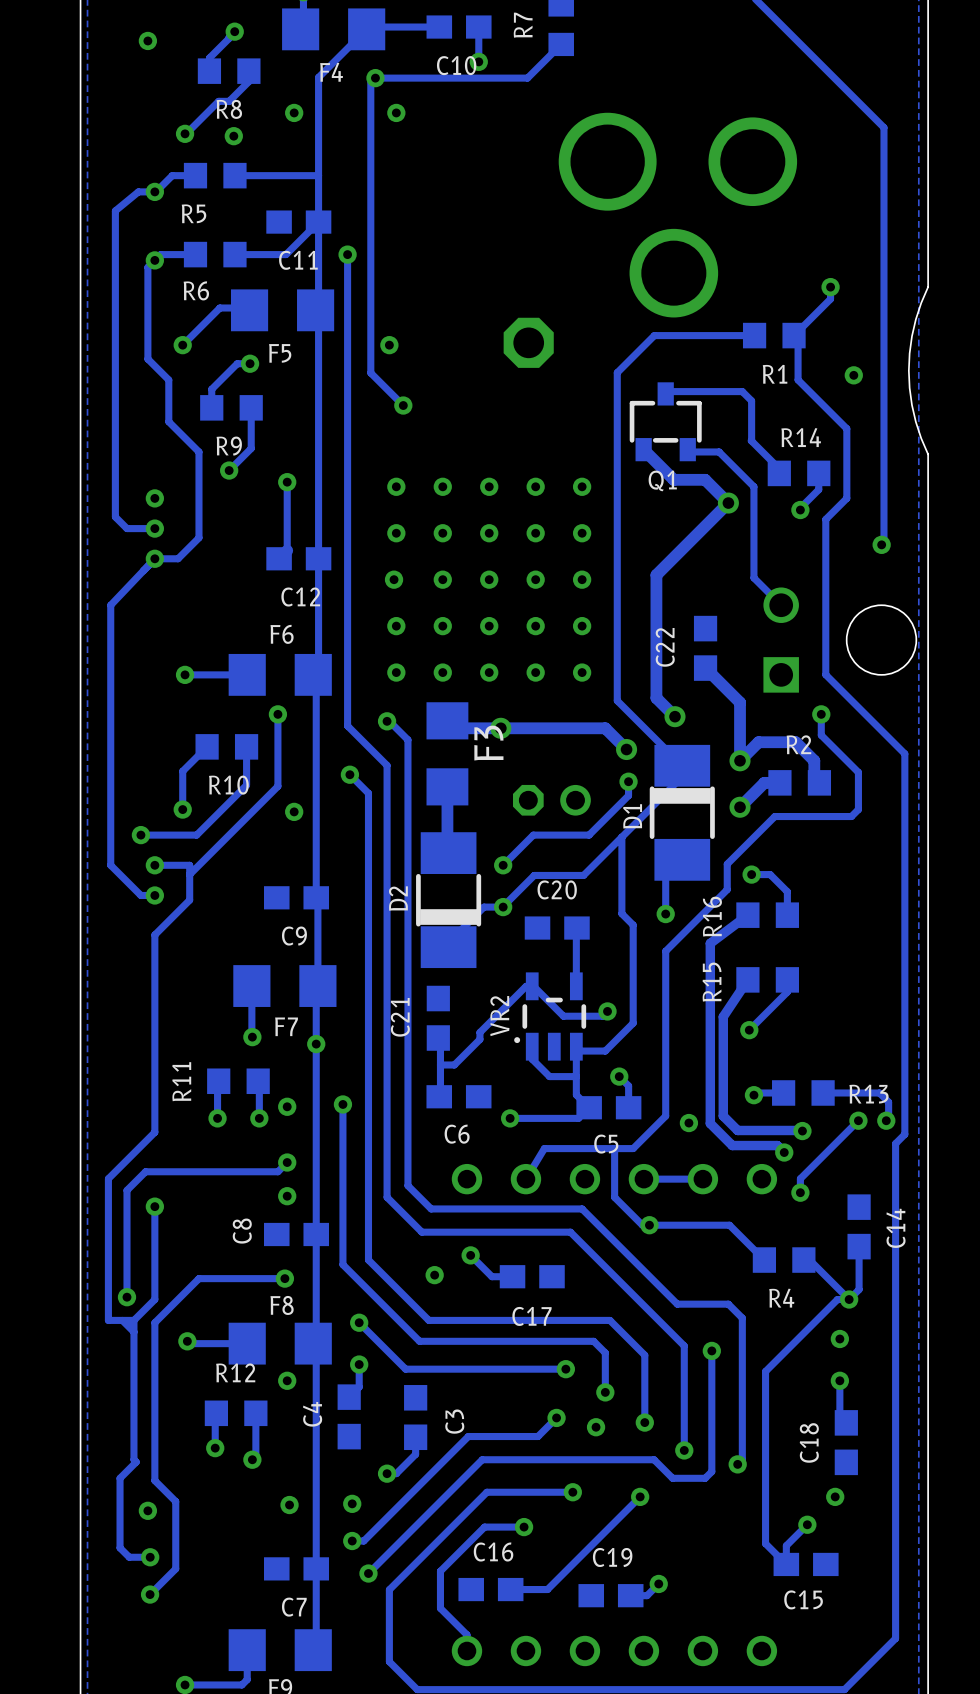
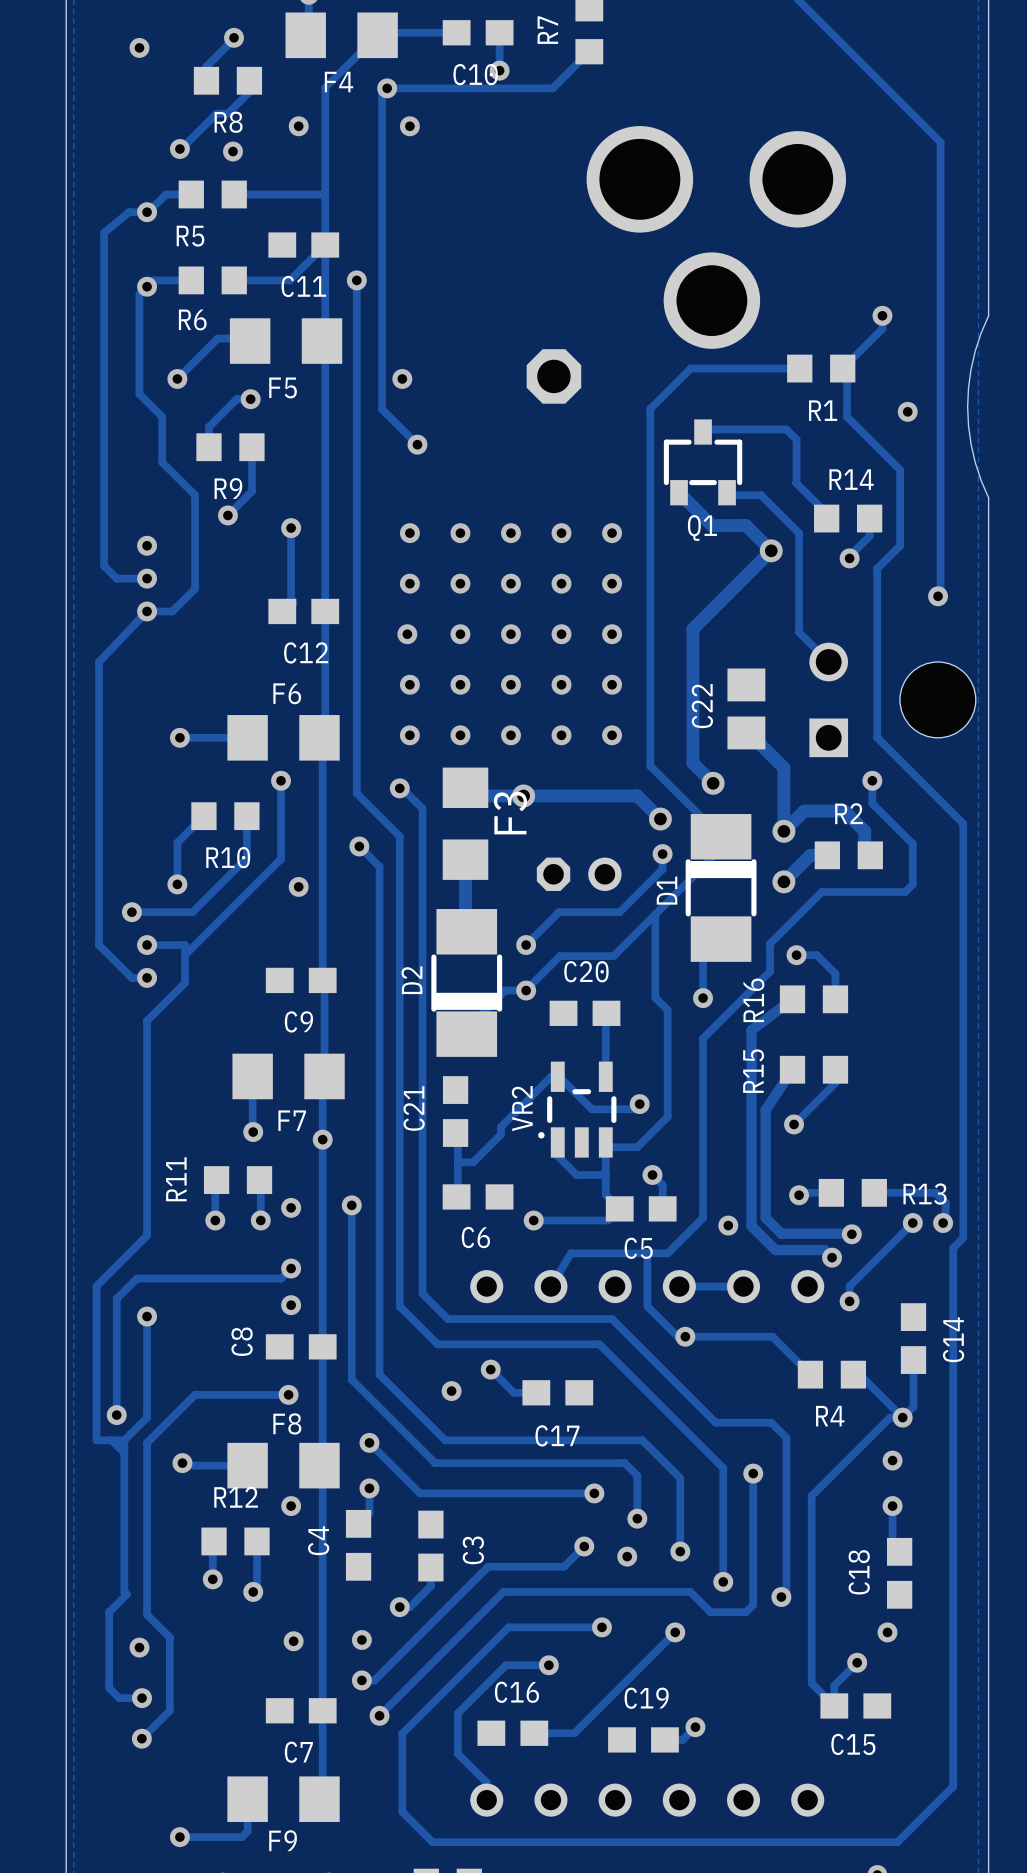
C22 footprint: [693, 615, 718, 681] -> [727, 668, 766, 750]

